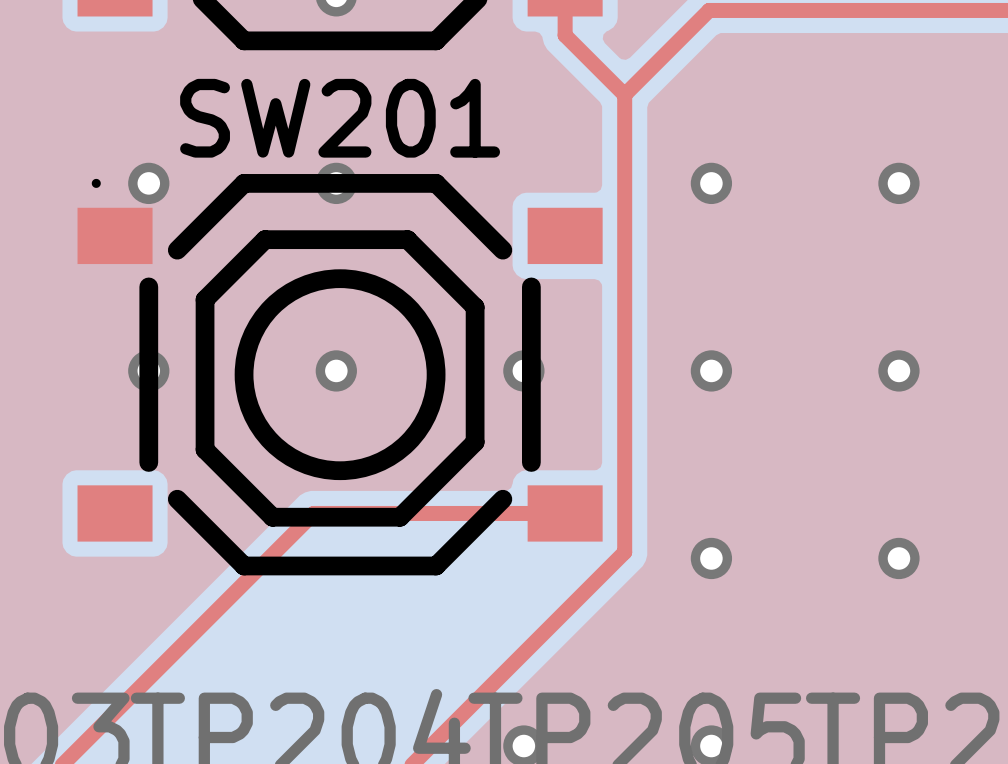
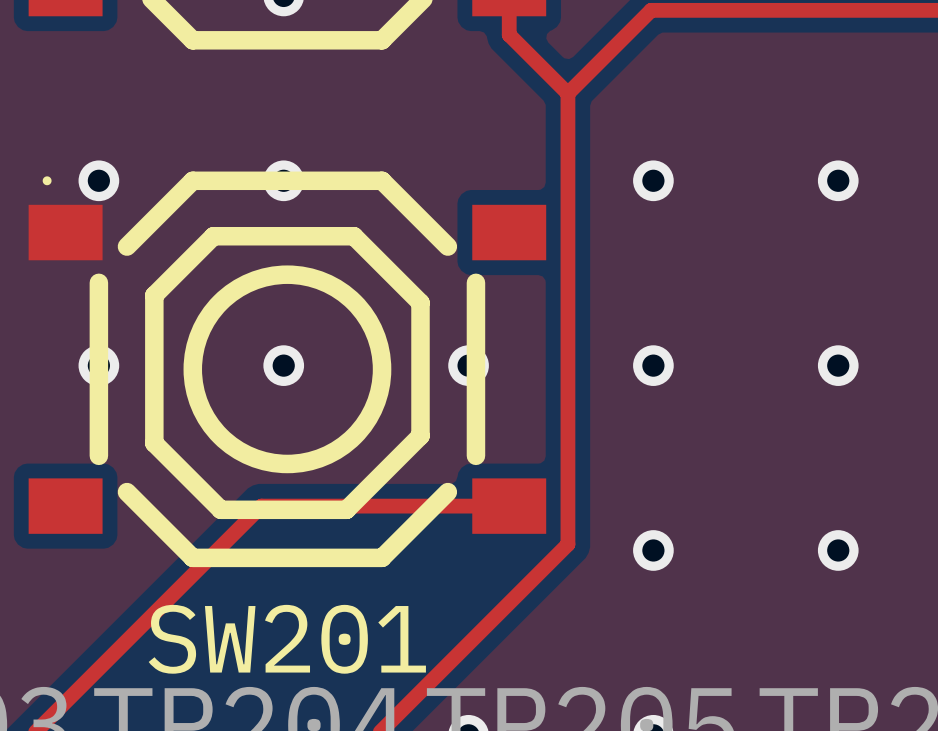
SW201 name position: SW201 (340, 118) -> SW201 (287, 639)

